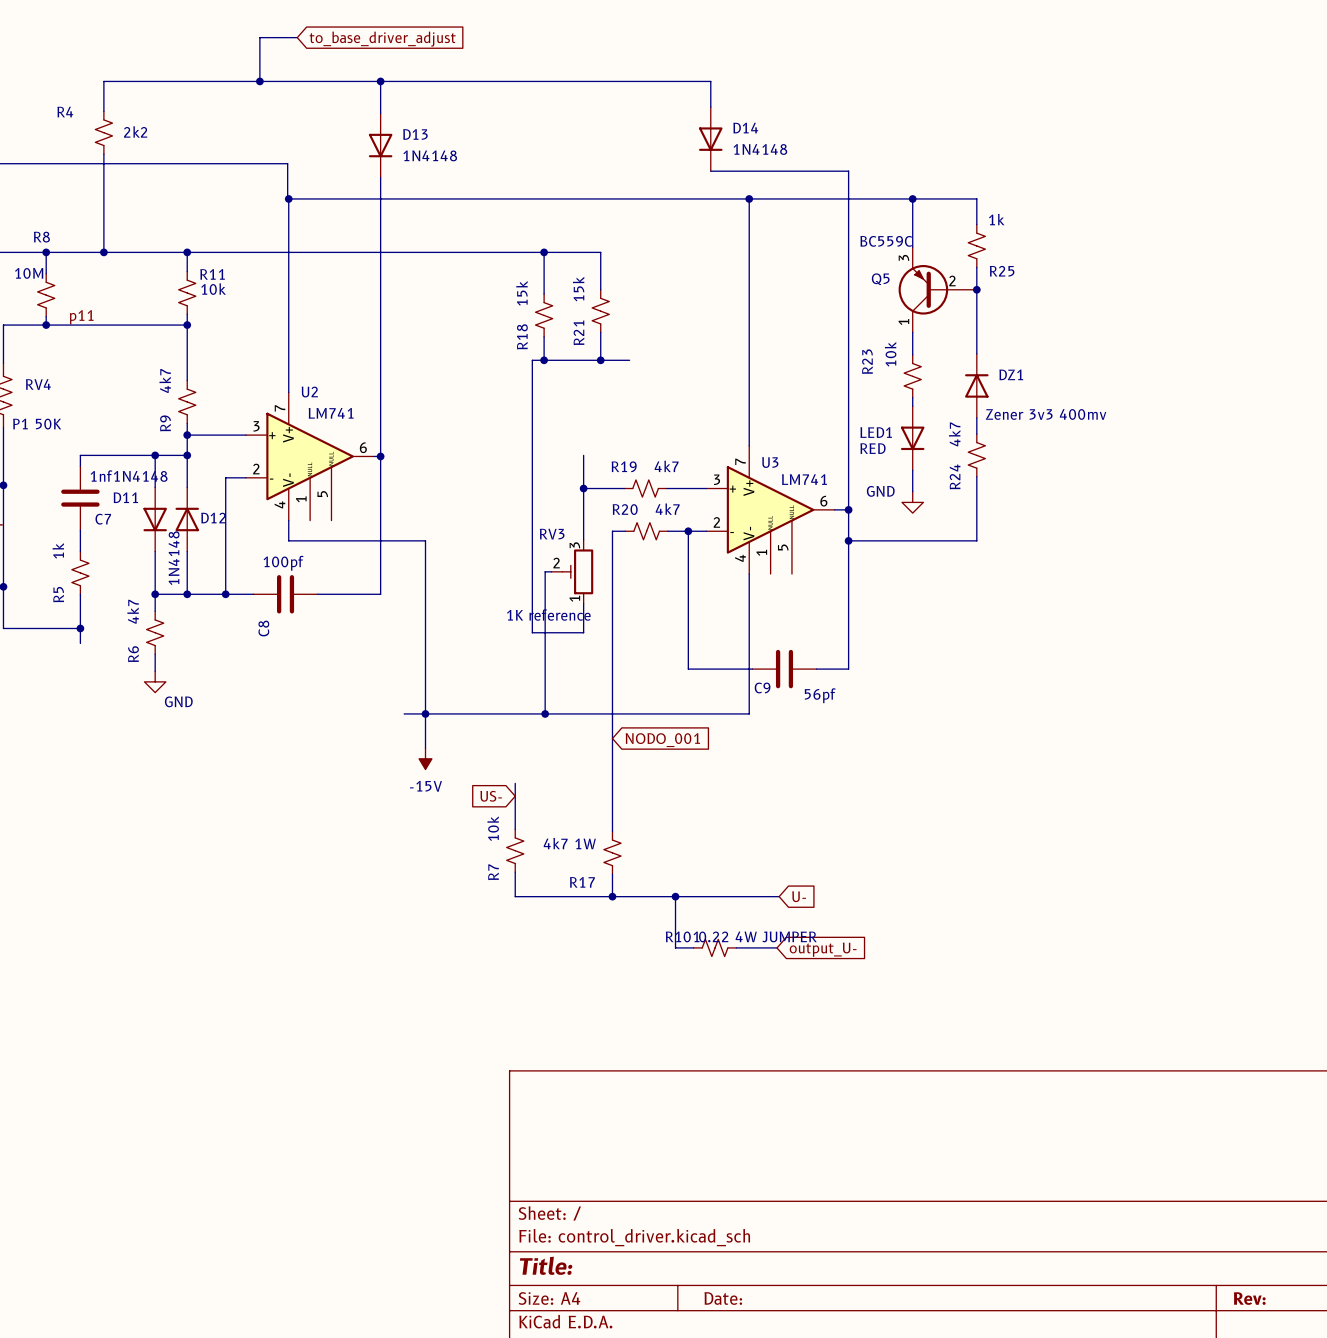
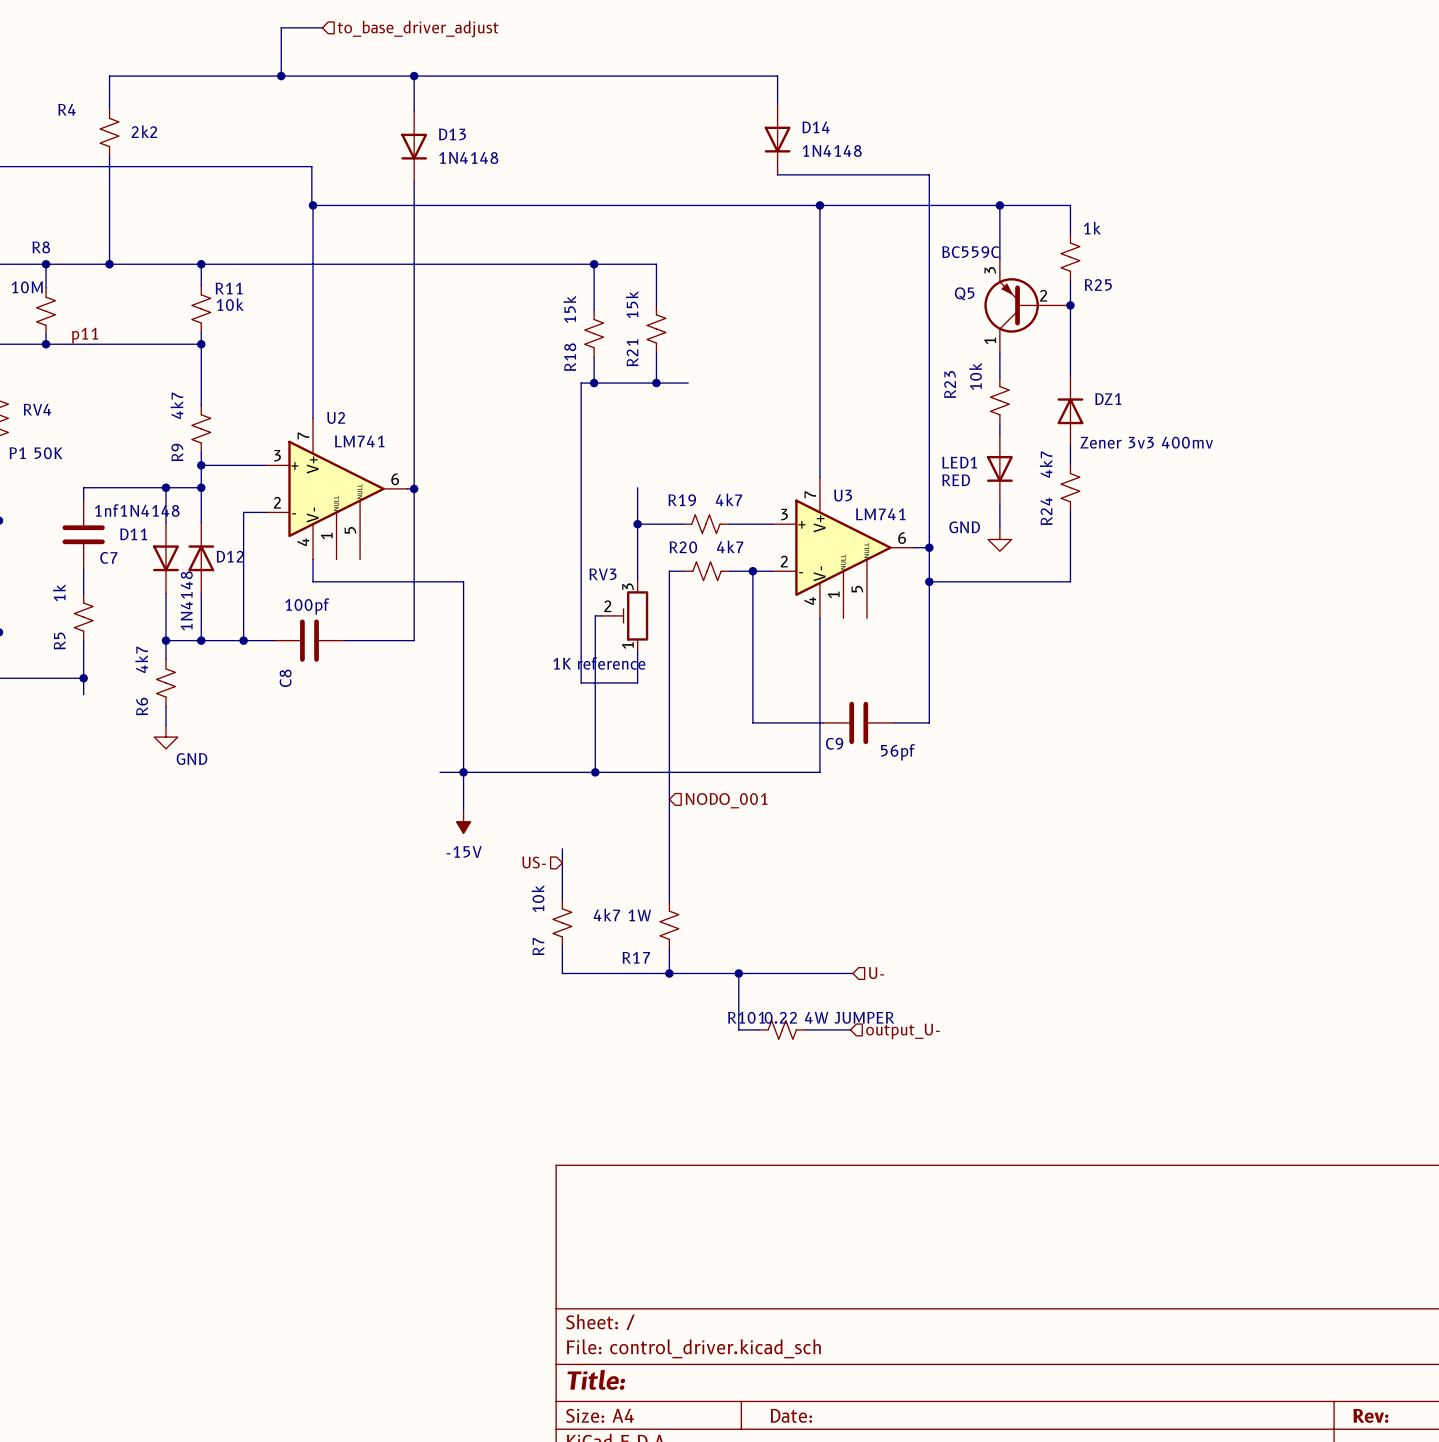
hierarchical label: none -> to_base_driver_adjust (418, 29)
global label: to_base_driver_adjust (382, 39) -> none
hierarchical label: none -> NODO_001 (726, 800)
global label: NODO_001 (662, 740) -> none
hierarchical label: none -> US- (534, 862)
global label: US- (491, 796) -> none
global label: U- (799, 896) -> none
hierarchical label: none -> U- (876, 973)
global label: output_U- (823, 949) -> none
hierarchical label: none -> output_U- (902, 1031)

